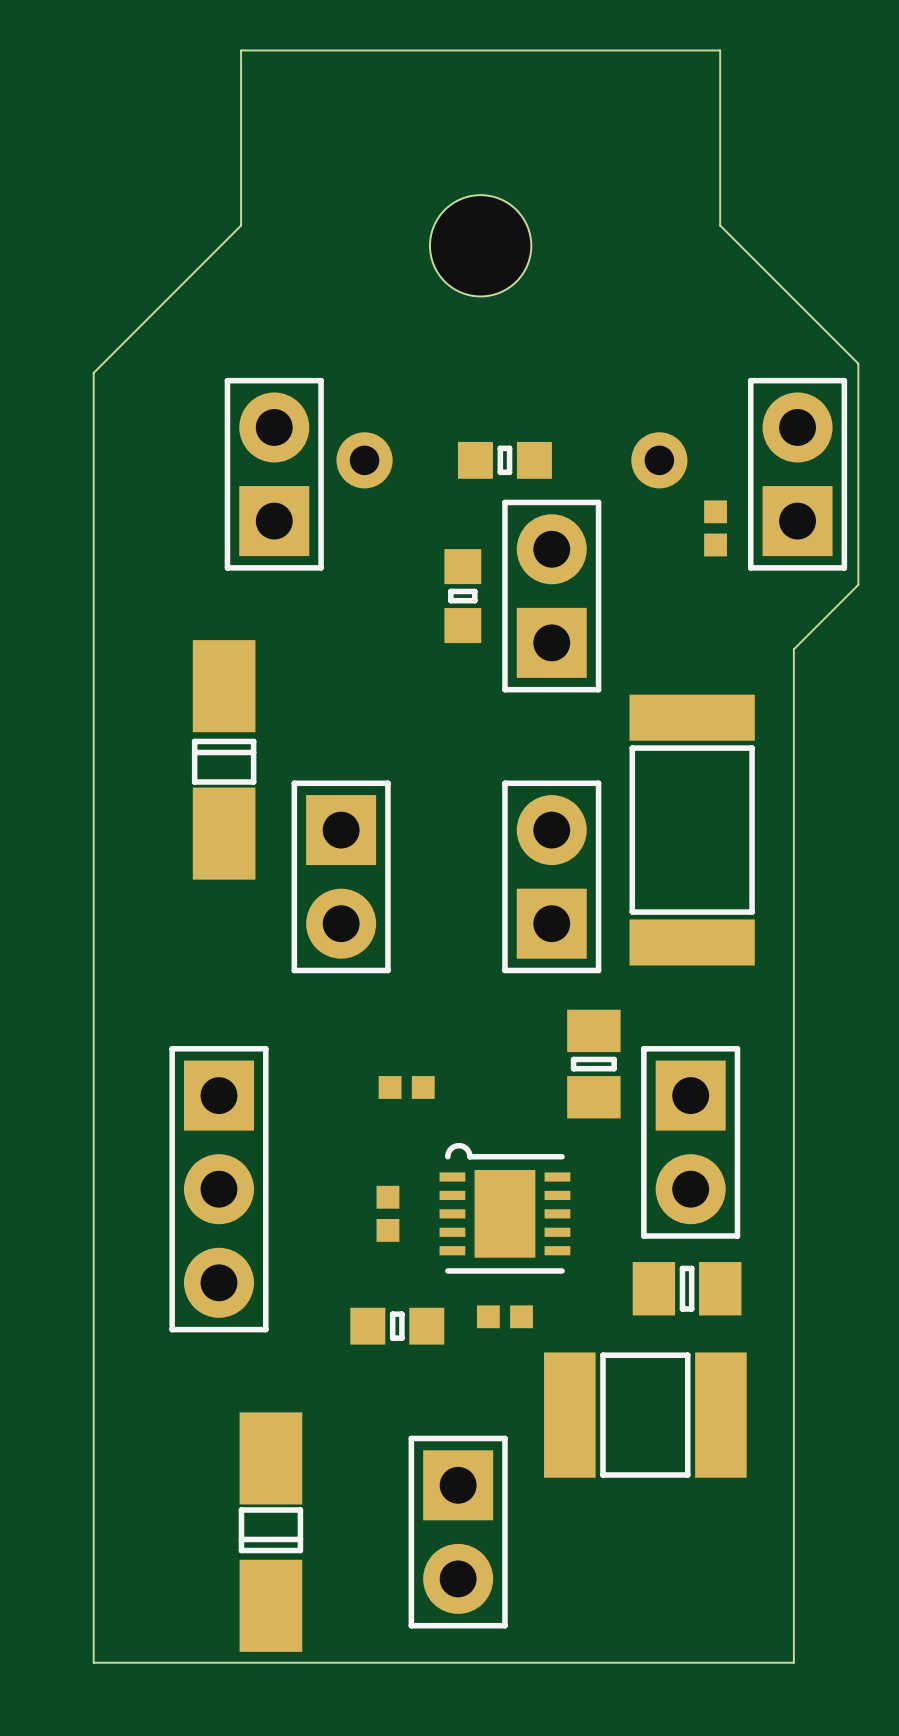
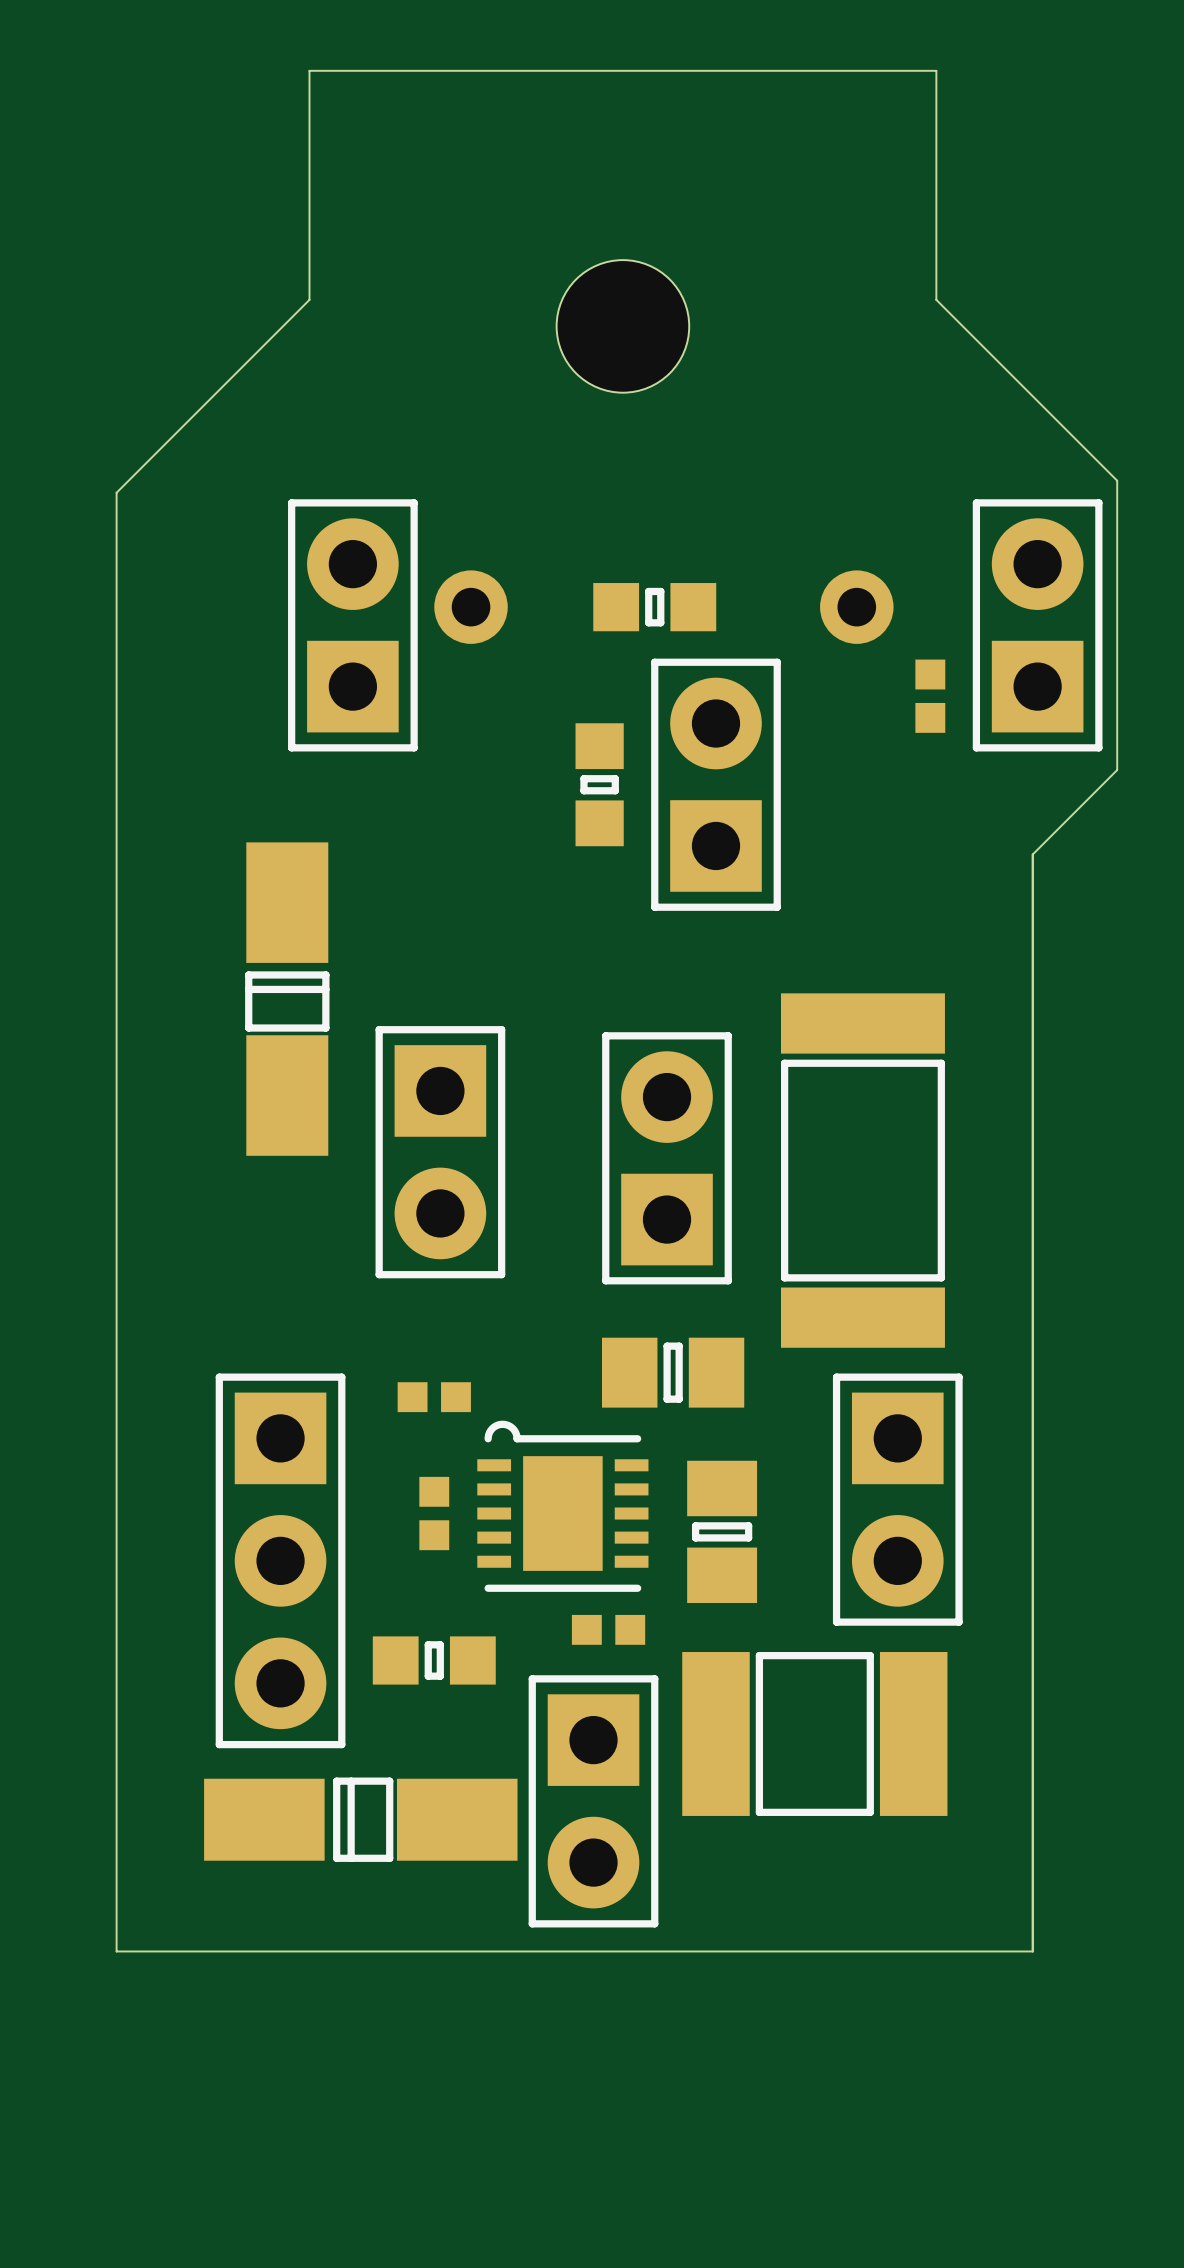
part position: (692, 830) -> (862, 1170)
part position: (551, 876) -> (667, 1158)
part: none -> (673, 1372)
part: none -> (434, 1397)
part: (593, 1064) -> none
part: (406, 1087) -> none
part: none -> (434, 1513)
part: none -> (722, 1531)
part position: (504, 1208) -> (562, 1506)
part: (387, 1213) -> none
part: none -> (608, 1629)
part: (687, 1288) -> none
part: (504, 1316) -> none
part position: (397, 1326) -> (434, 1660)
part position: (645, 1415) -> (814, 1733)
board edge: (93, 1487) (93, 1662) (793, 1662) (793, 1487) -> (116, 1951) (1032, 1951)
part rotation: 0° (270, 1532) -> 90° clockwise (360, 1819)
part position: (270, 1532) -> (360, 1819)
part position: (458, 1532) -> (593, 1801)

